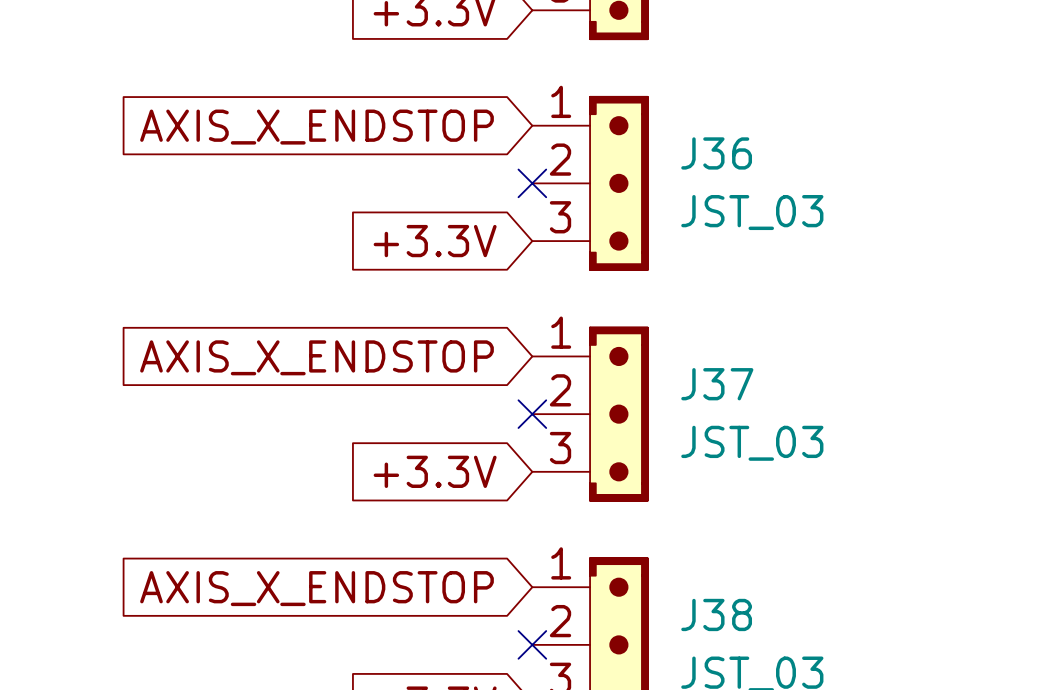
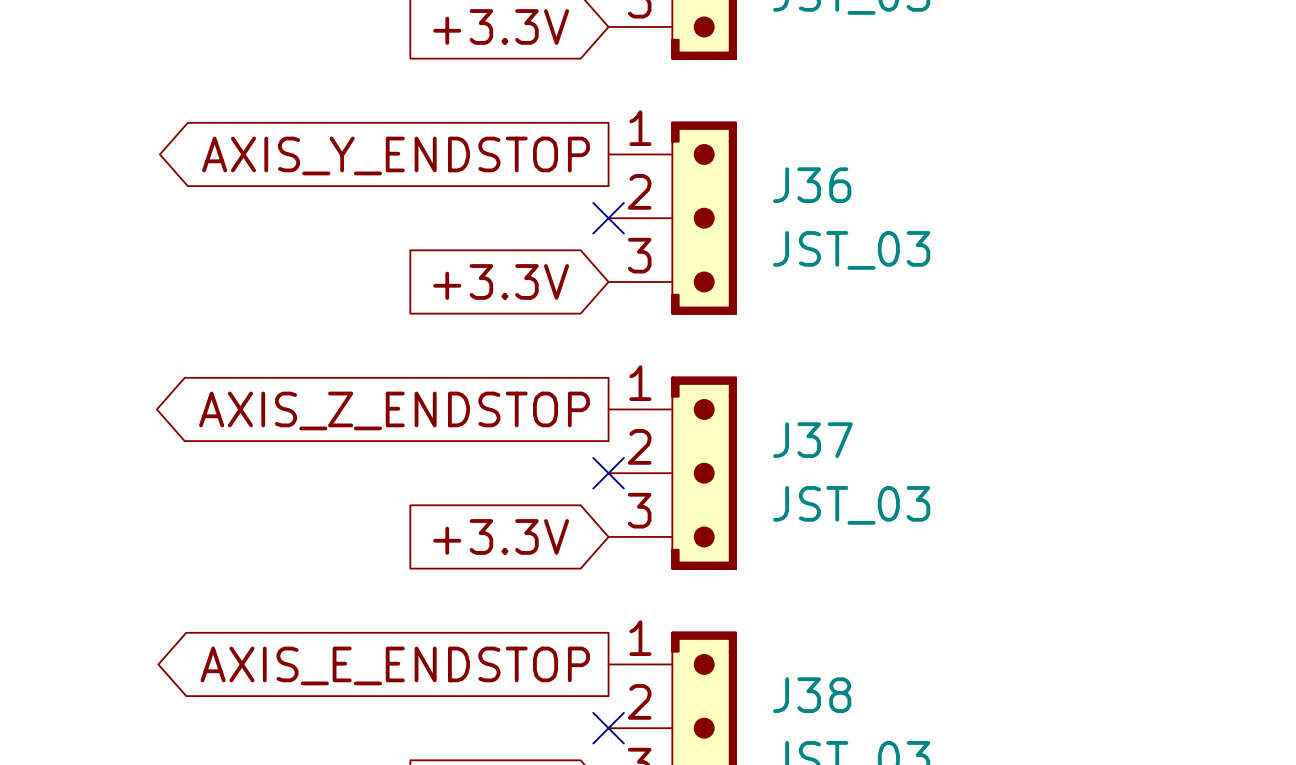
global label shape: input (317, 127) -> output (396, 155)
global label: AXIS_X_ENDSTOP (317, 127) -> AXIS_Y_ENDSTOP (396, 155)
global label shape: input (317, 357) -> output (394, 410)
global label: AXIS_X_ENDSTOP (317, 357) -> AXIS_Z_ENDSTOP (394, 410)
global label shape: input (317, 588) -> output (395, 665)
global label: AXIS_X_ENDSTOP (317, 588) -> AXIS_E_ENDSTOP (395, 665)

